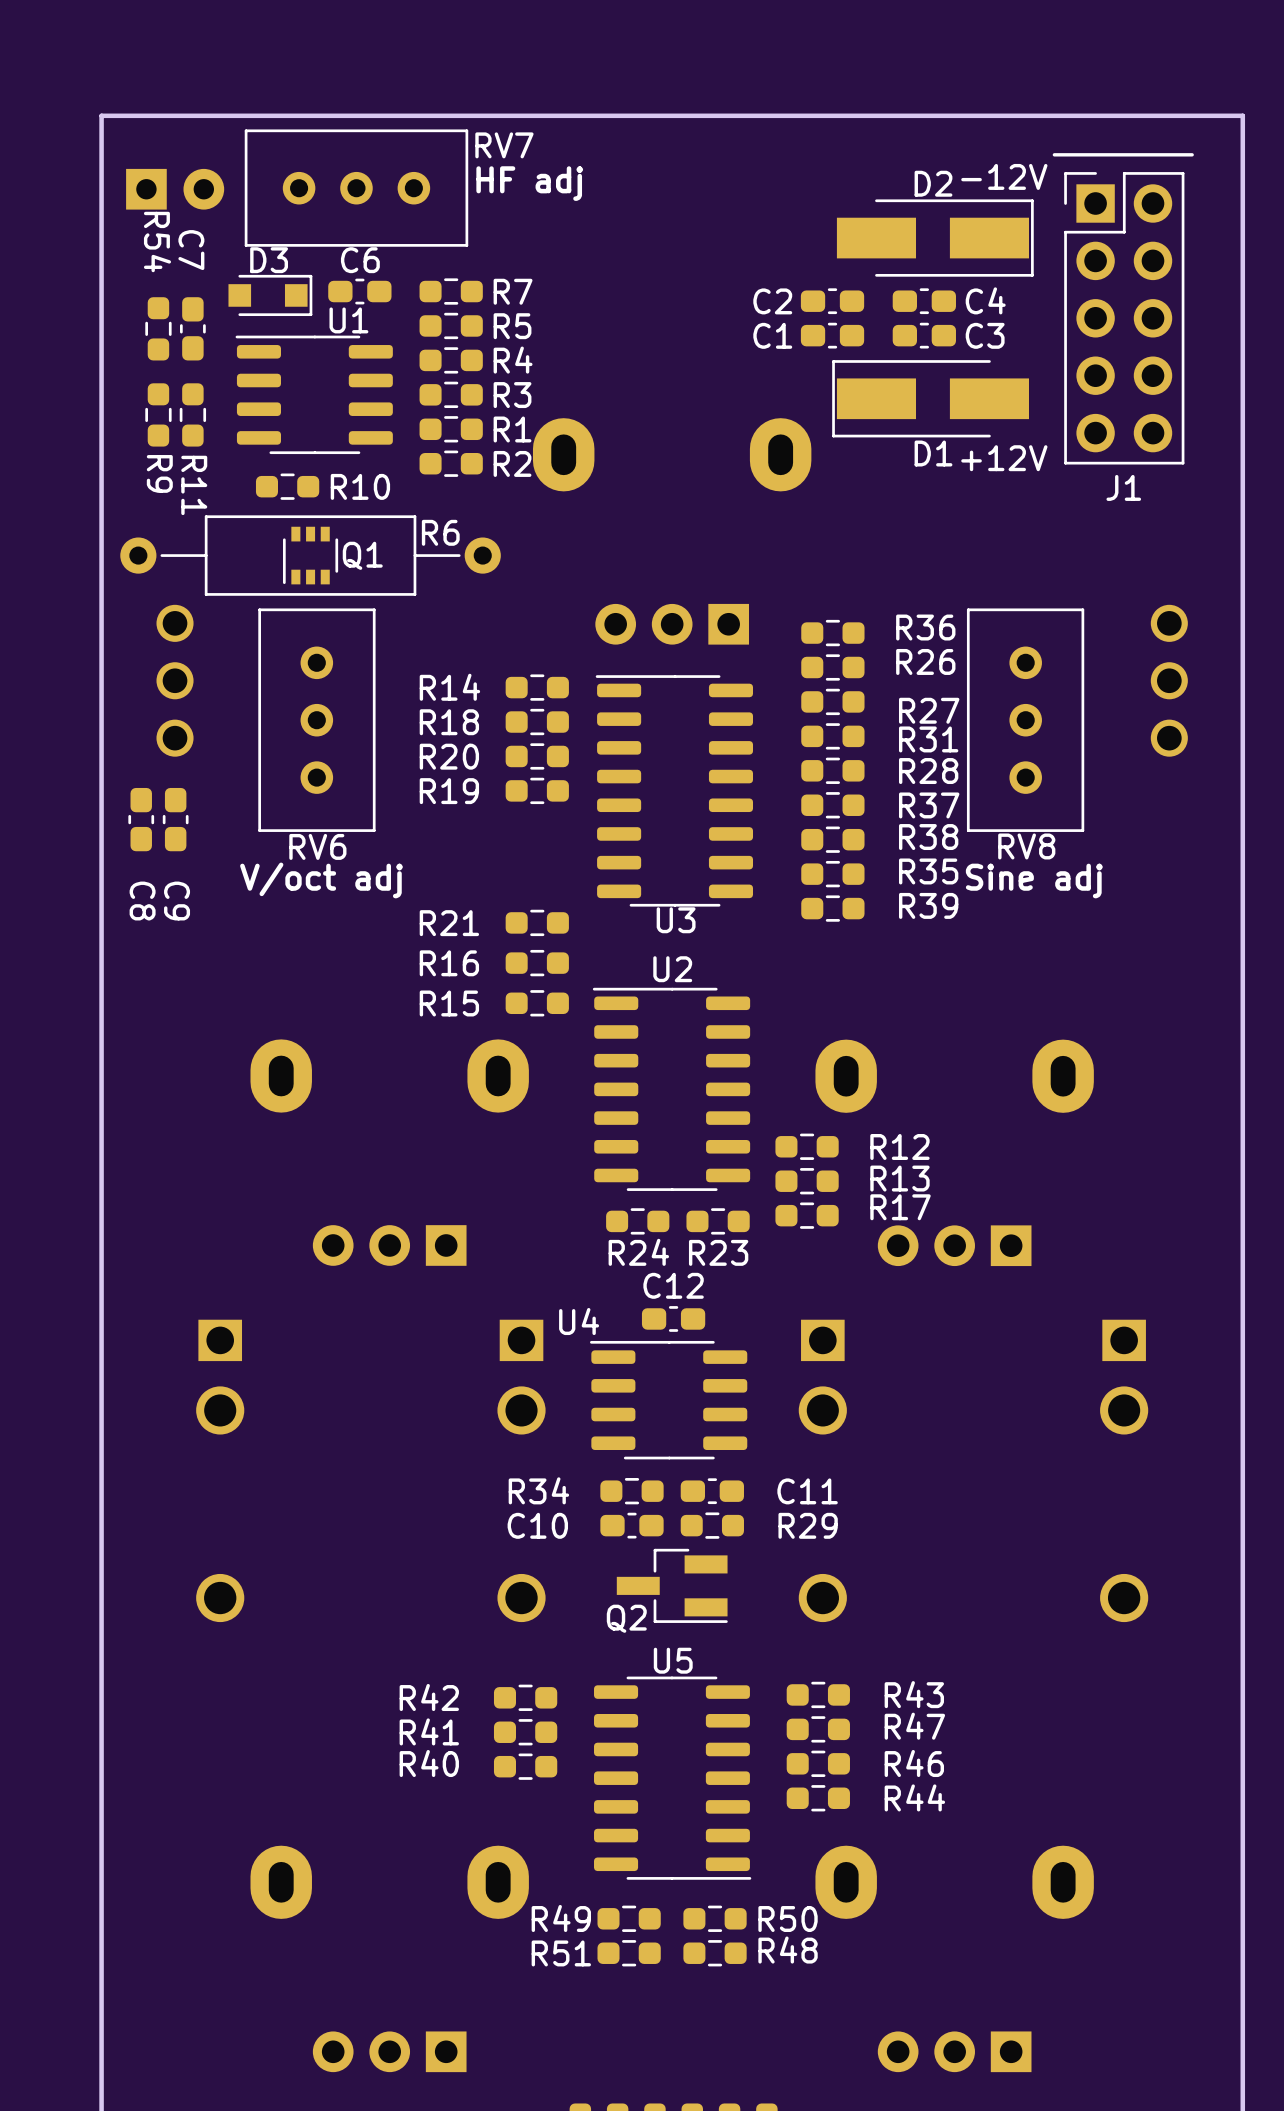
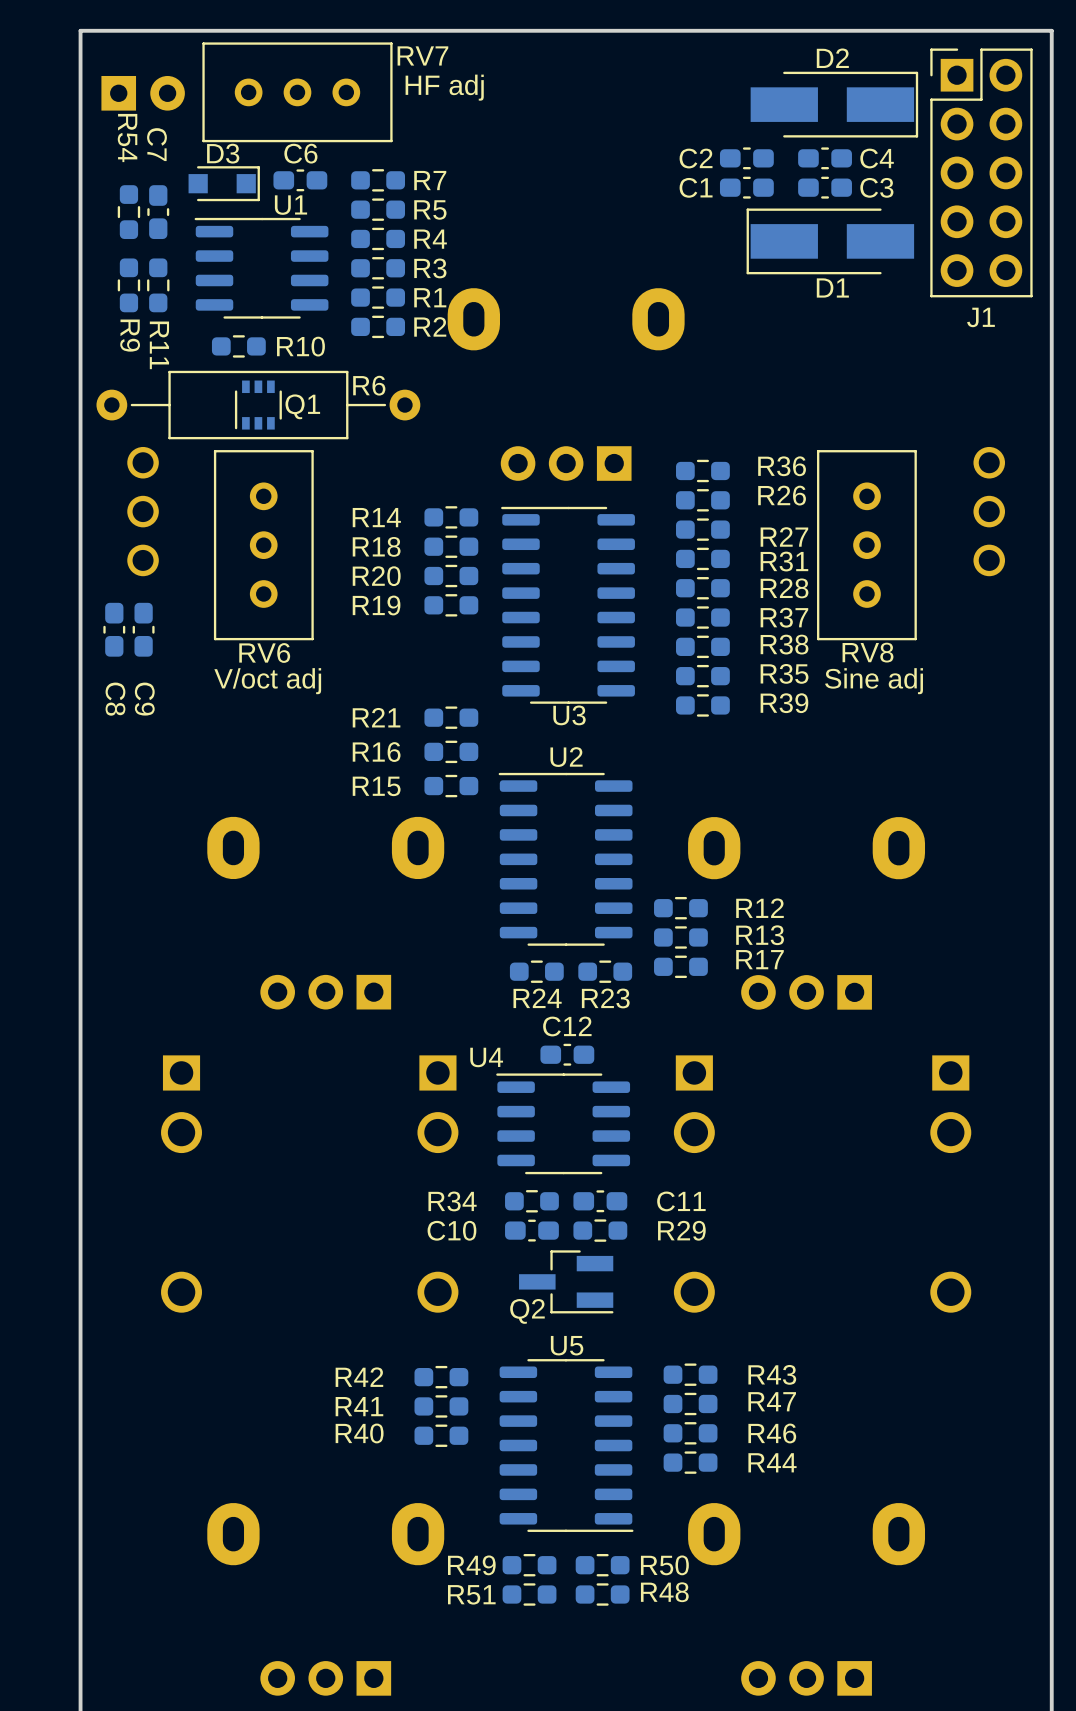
line: (1192, 154) (1054, 154) -> none
text: -12V (1004, 176) -> none
D2 position: (935, 238) -> (834, 104)
C2 position: (832, 301) -> (746, 158)
C4 position: (924, 301) -> (825, 158)
J1 position: (1124, 318) -> (981, 172)
C1 position: (832, 335) -> (746, 187)
C3 position: (924, 335) -> (825, 187)
D1 position: (930, 398) -> (830, 241)
text: +12V (1004, 458) -> none

